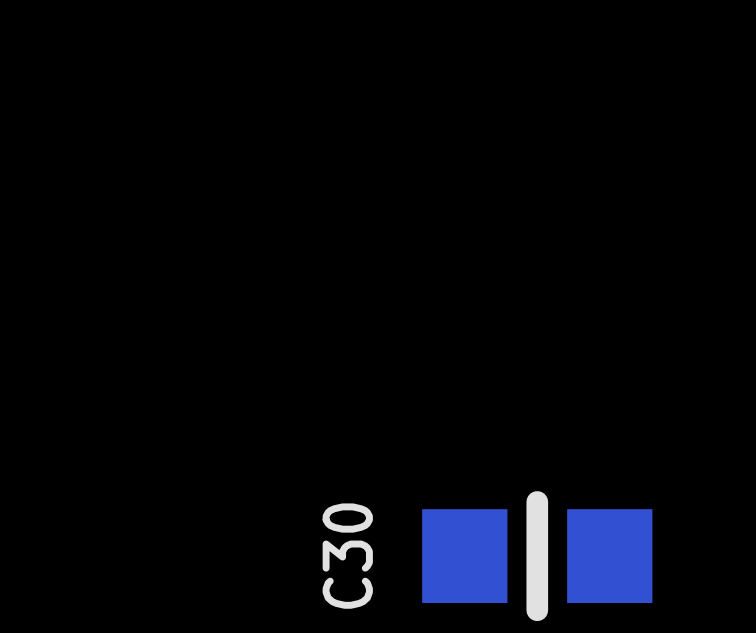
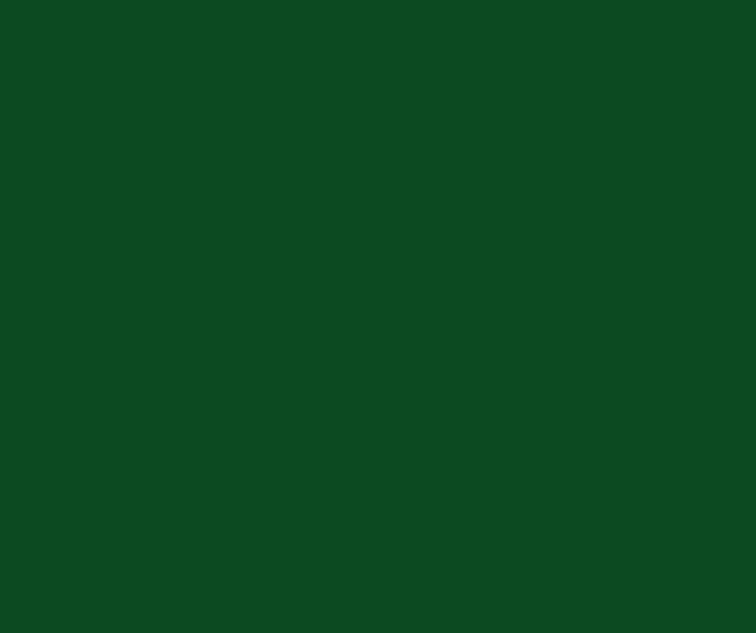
C30: (537, 556) -> none

